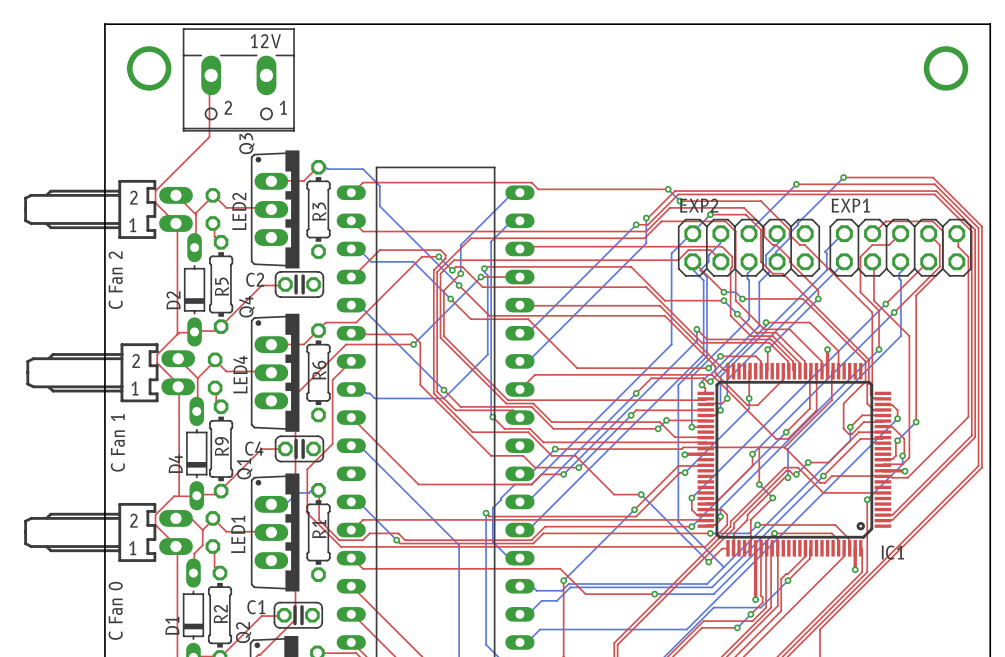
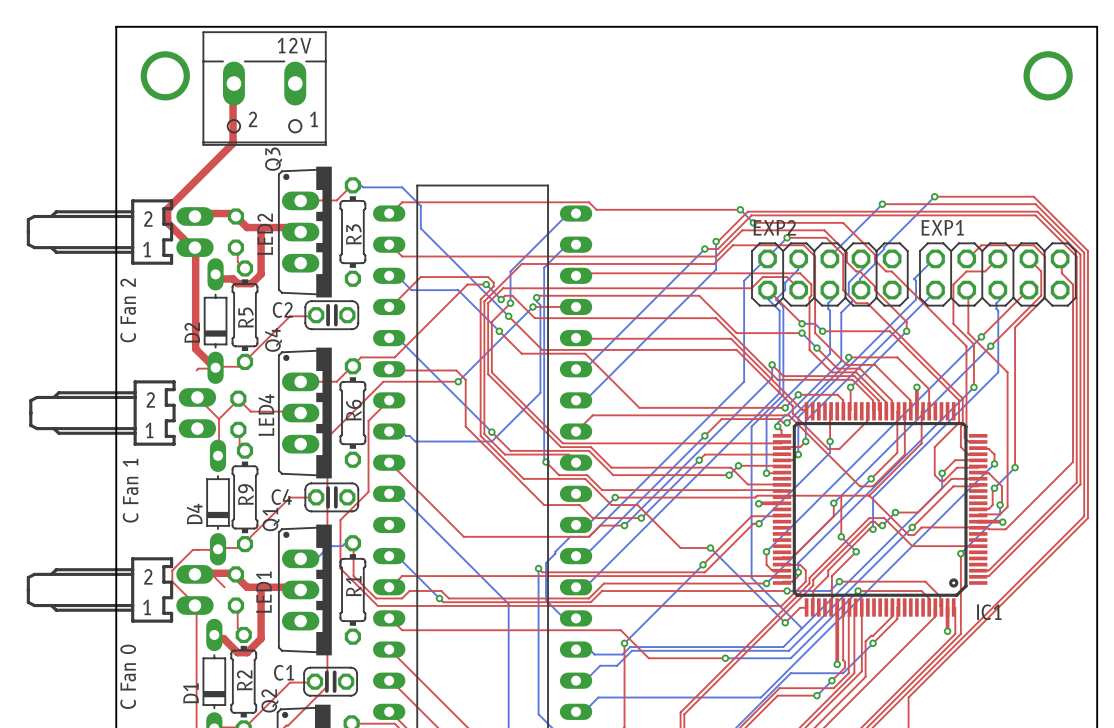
top track: (211, 75) (209, 76) (209, 137) (155, 191) (155, 202) (177, 224) (177, 334) (157, 354) (157, 363) (177, 383) (179, 388) (179, 496) -> (233, 83) (233, 143) (167, 208) (167, 222) (191, 246) (194, 247) (195, 349) (215, 367)
top track: (175, 195) (195, 214) -> none
top track: none -> (261, 227) (261, 274) (251, 283) (237, 283) (233, 278) (219, 278) (215, 274)
top track: (271, 209) (226, 207) (212, 195) (195, 212) (195, 246) -> (300, 232) (298, 227) (247, 227) (233, 213) (195, 213) (194, 216)
top track: none -> (261, 587) (261, 638) (247, 652) (237, 652) (223, 638) (214, 638) (214, 634)
top track: (271, 532) (226, 531) (212, 518) (202, 530) (202, 545) (194, 553) (194, 572) -> (300, 589) (298, 587) (247, 587) (233, 573) (194, 574)

